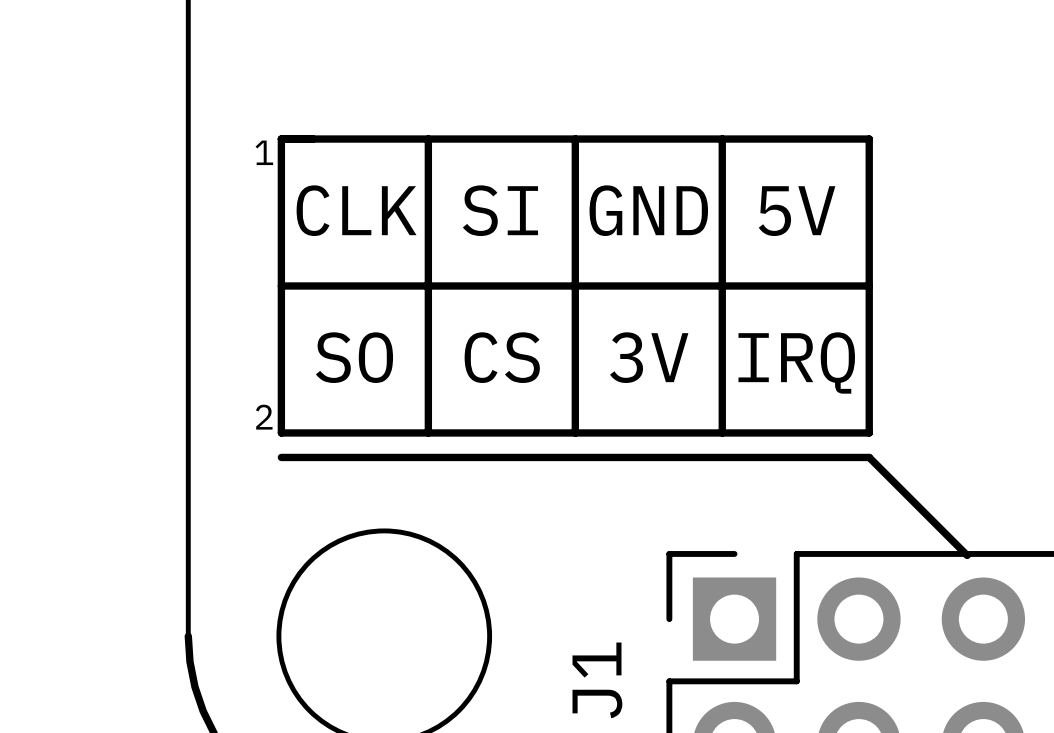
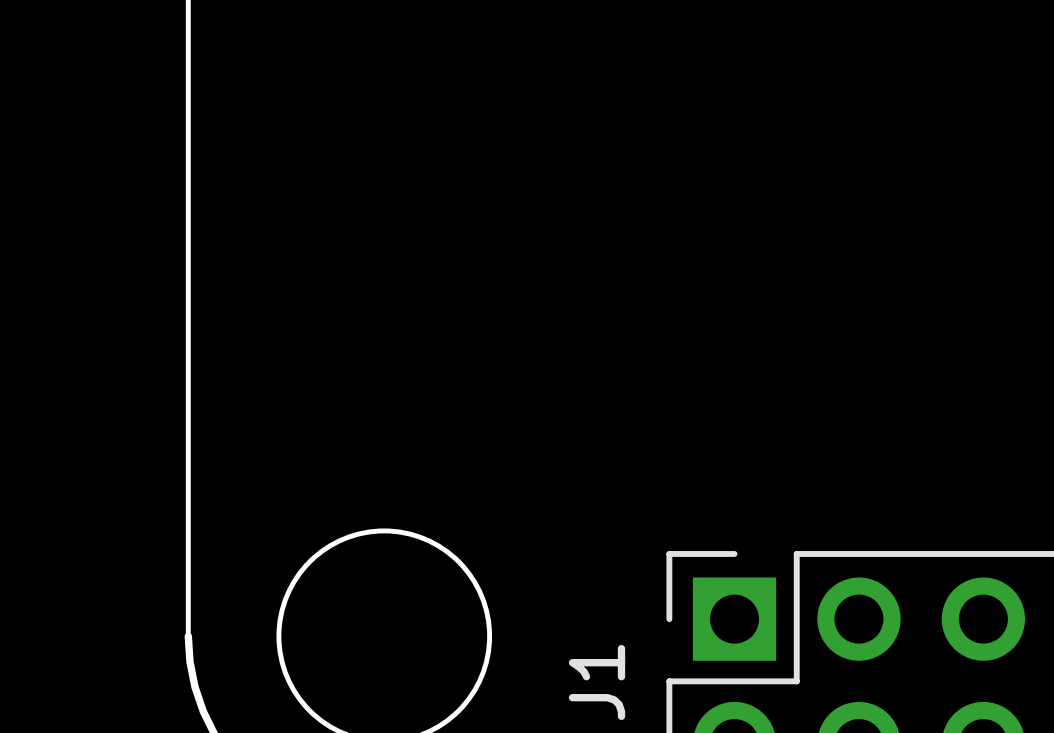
line: (281, 139) (869, 139) (869, 432) (281, 432) (281, 139) -> none
line: (428, 139) (428, 432) -> none
line: (575, 139) (575, 432) -> none
line: (722, 139) (722, 432) -> none
text: 1 (264, 152) -> none
text: CLK (356, 210) -> none
text: SI (500, 210) -> none
text: GND (648, 210) -> none
text: 5V (797, 211) -> none
line: (281, 286) (869, 286) -> none
text: SO (354, 357) -> none
text: CS (502, 357) -> none
text: 3V (649, 357) -> none
text: IRQ (796, 362) -> none
text: 2 (264, 417) -> none
line: (281, 457) (869, 457) (967, 555) -> none

